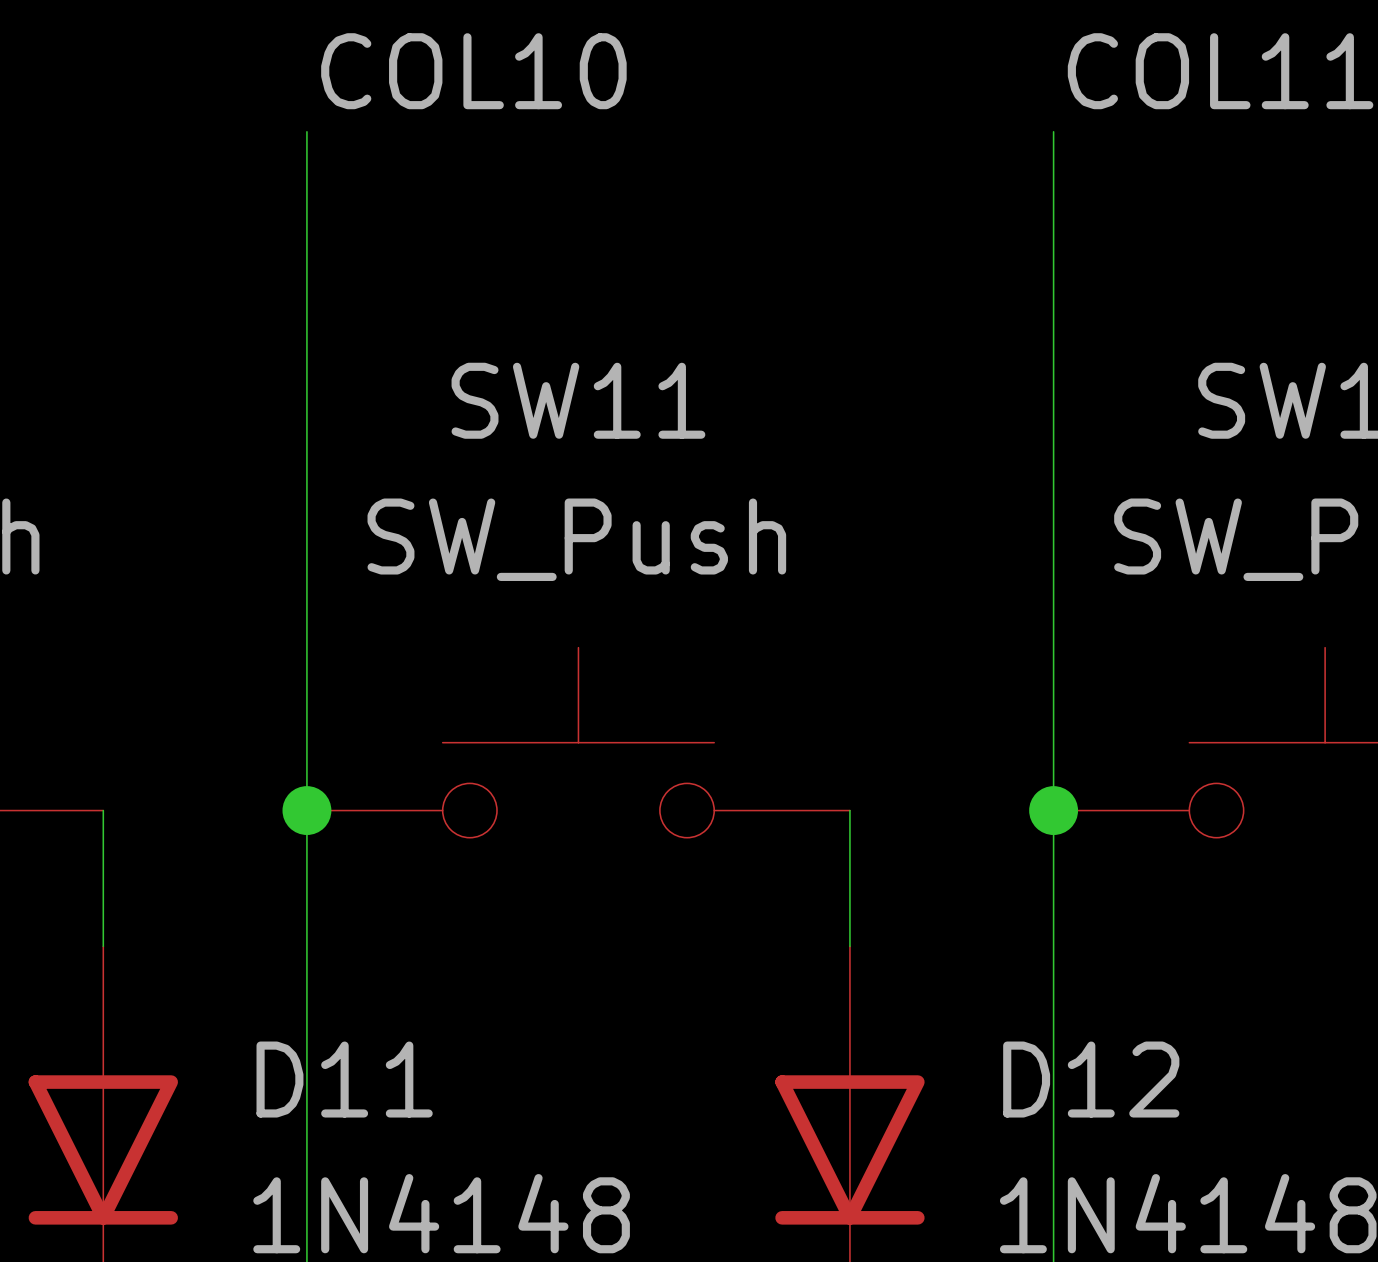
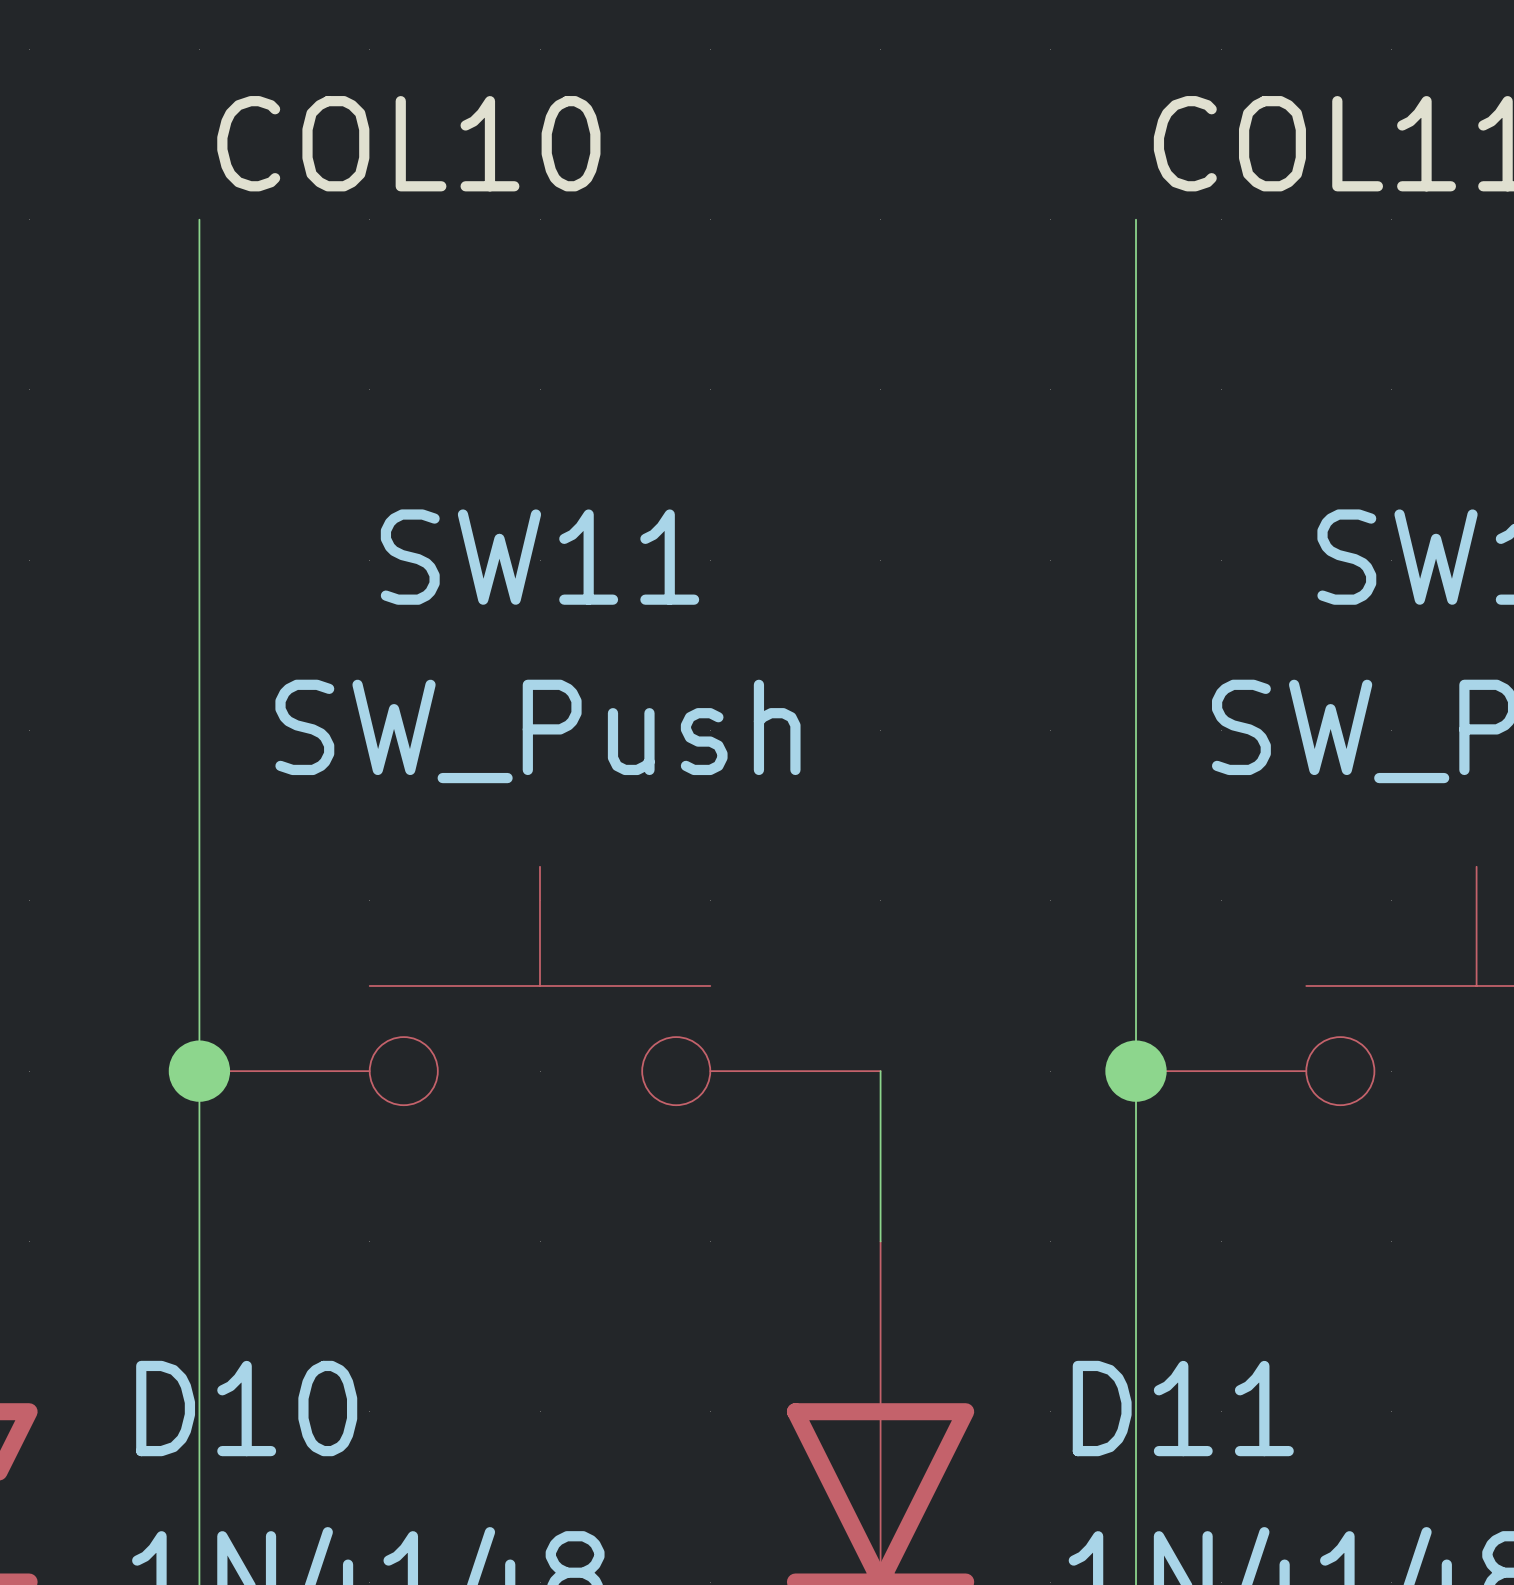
D11 name: D11 (344, 1079) -> D10 (246, 1408)
D12 name: D12 (1091, 1079) -> D11 (1183, 1408)

